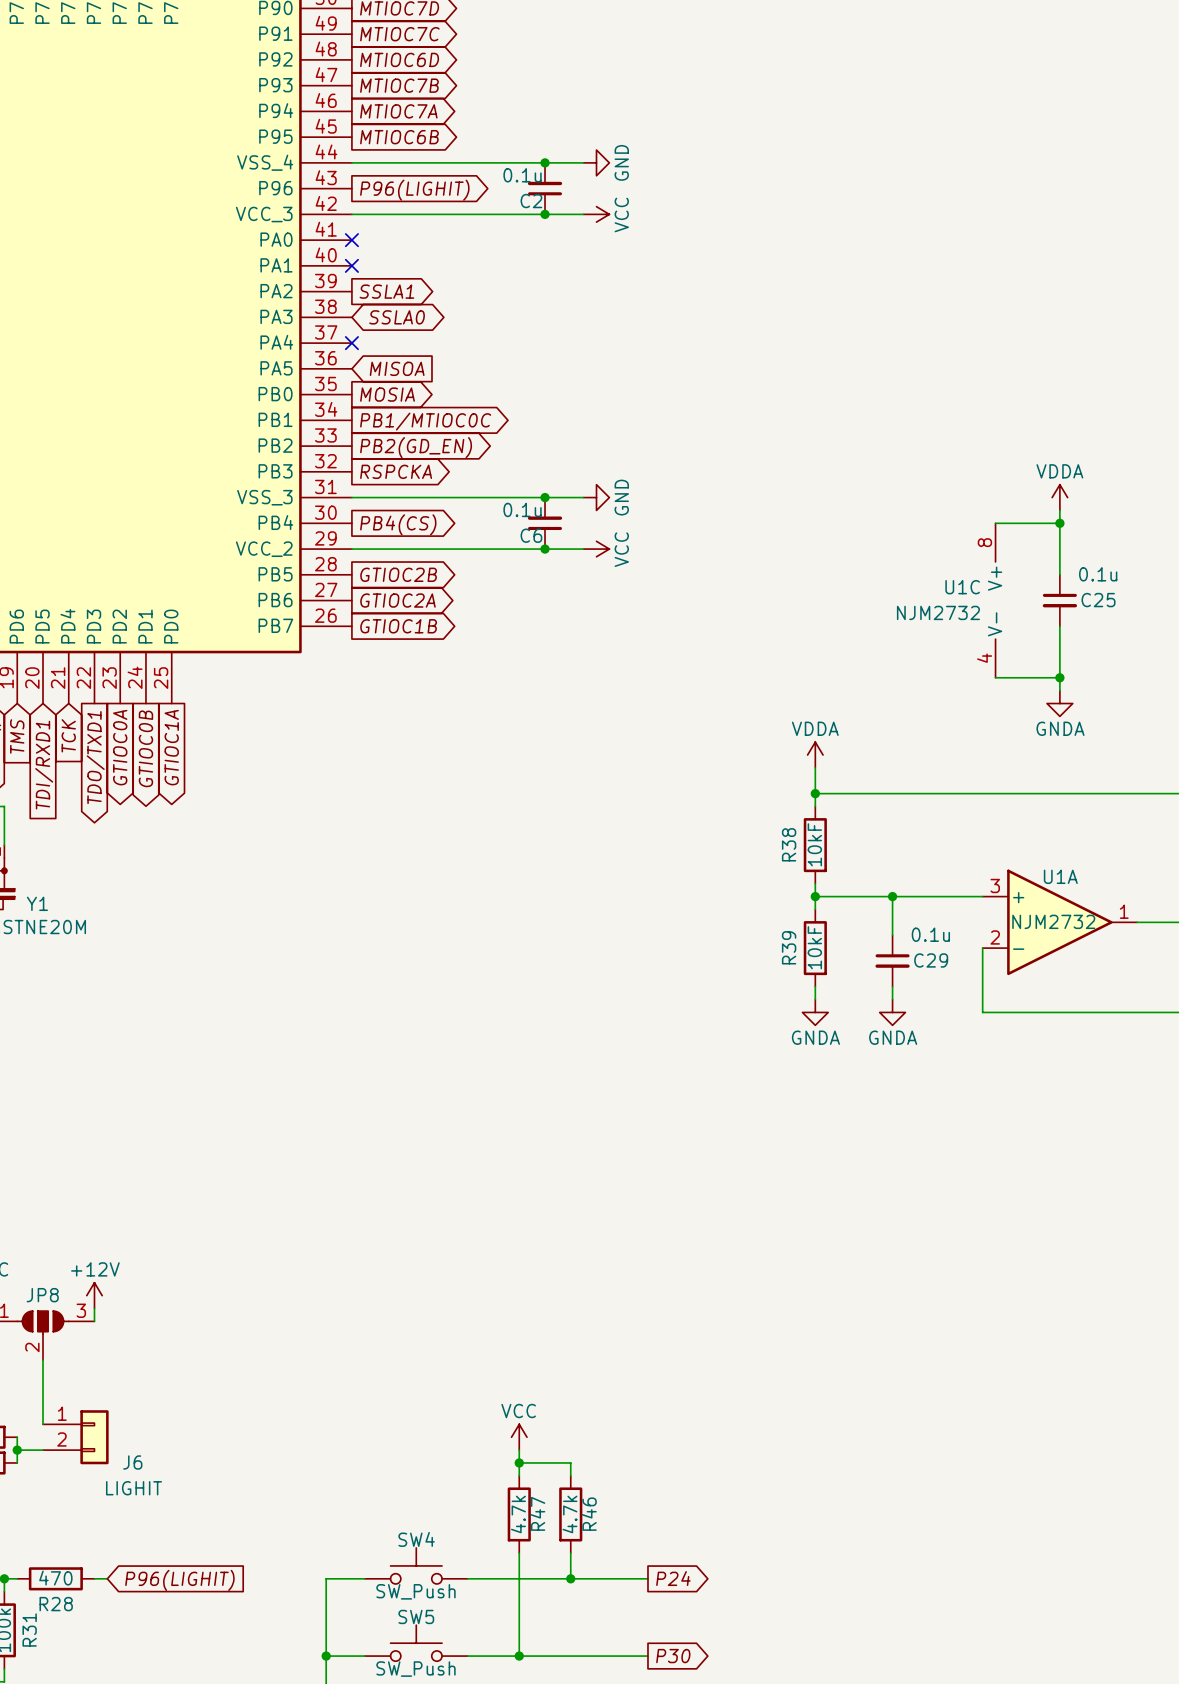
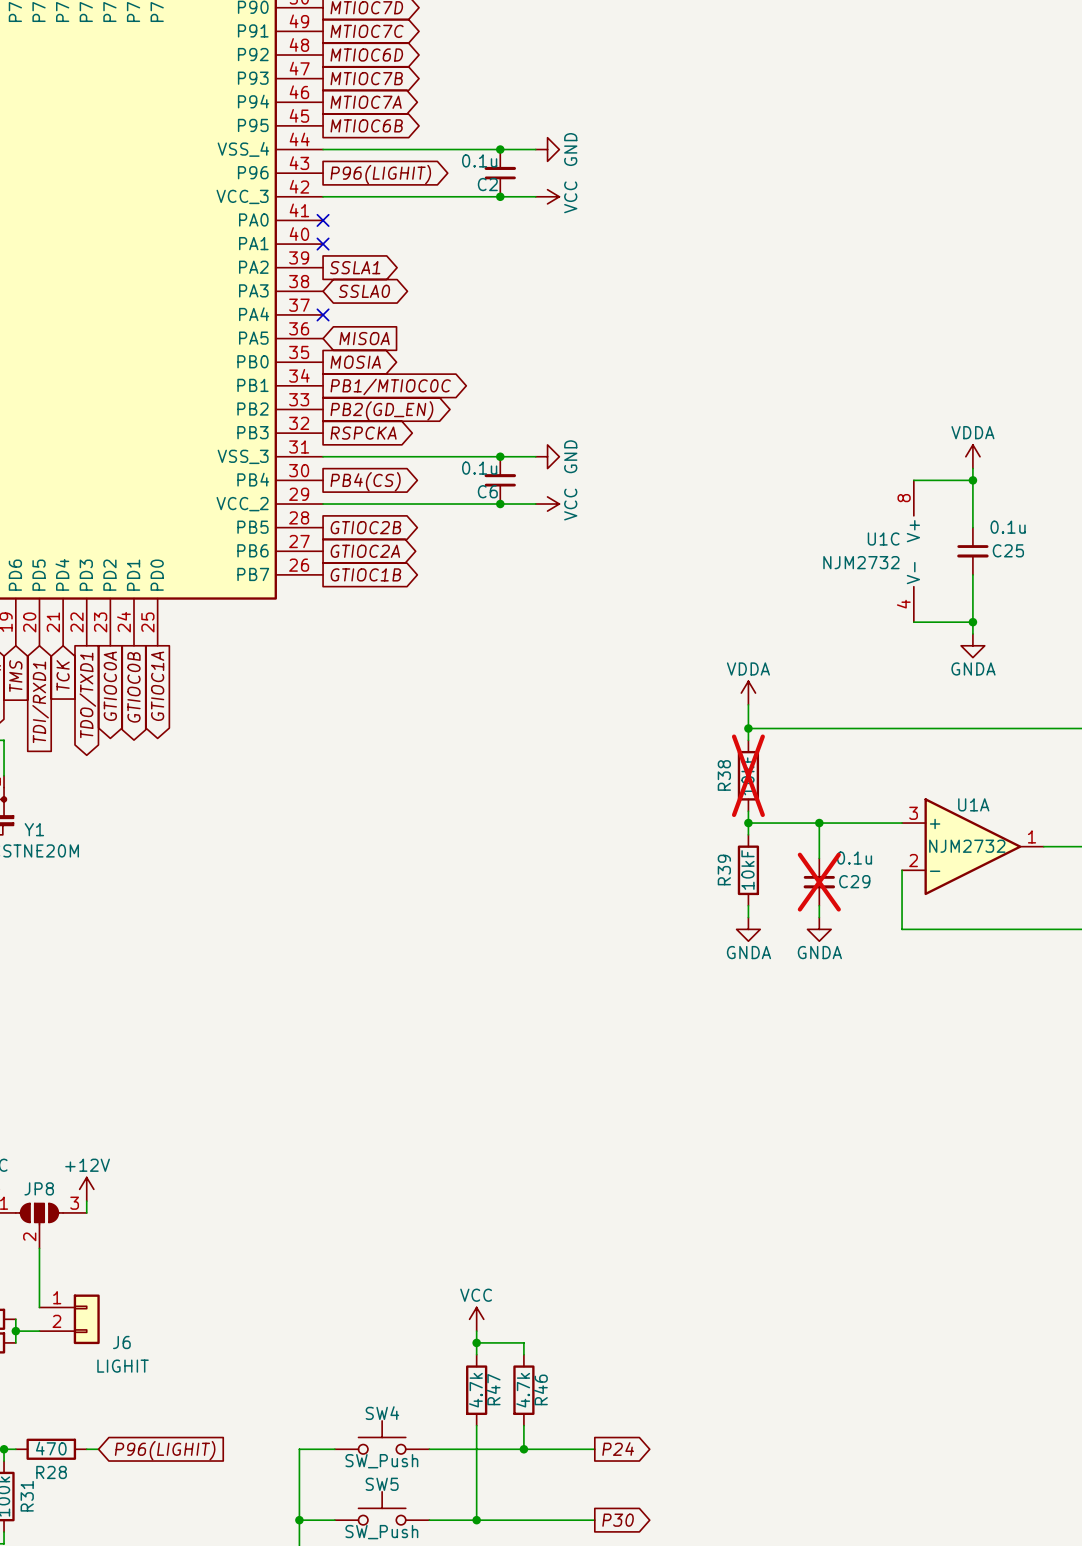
R38 do-not-place cross: none -> (748, 775)
C29 do-not-place cross: none -> (819, 882)

